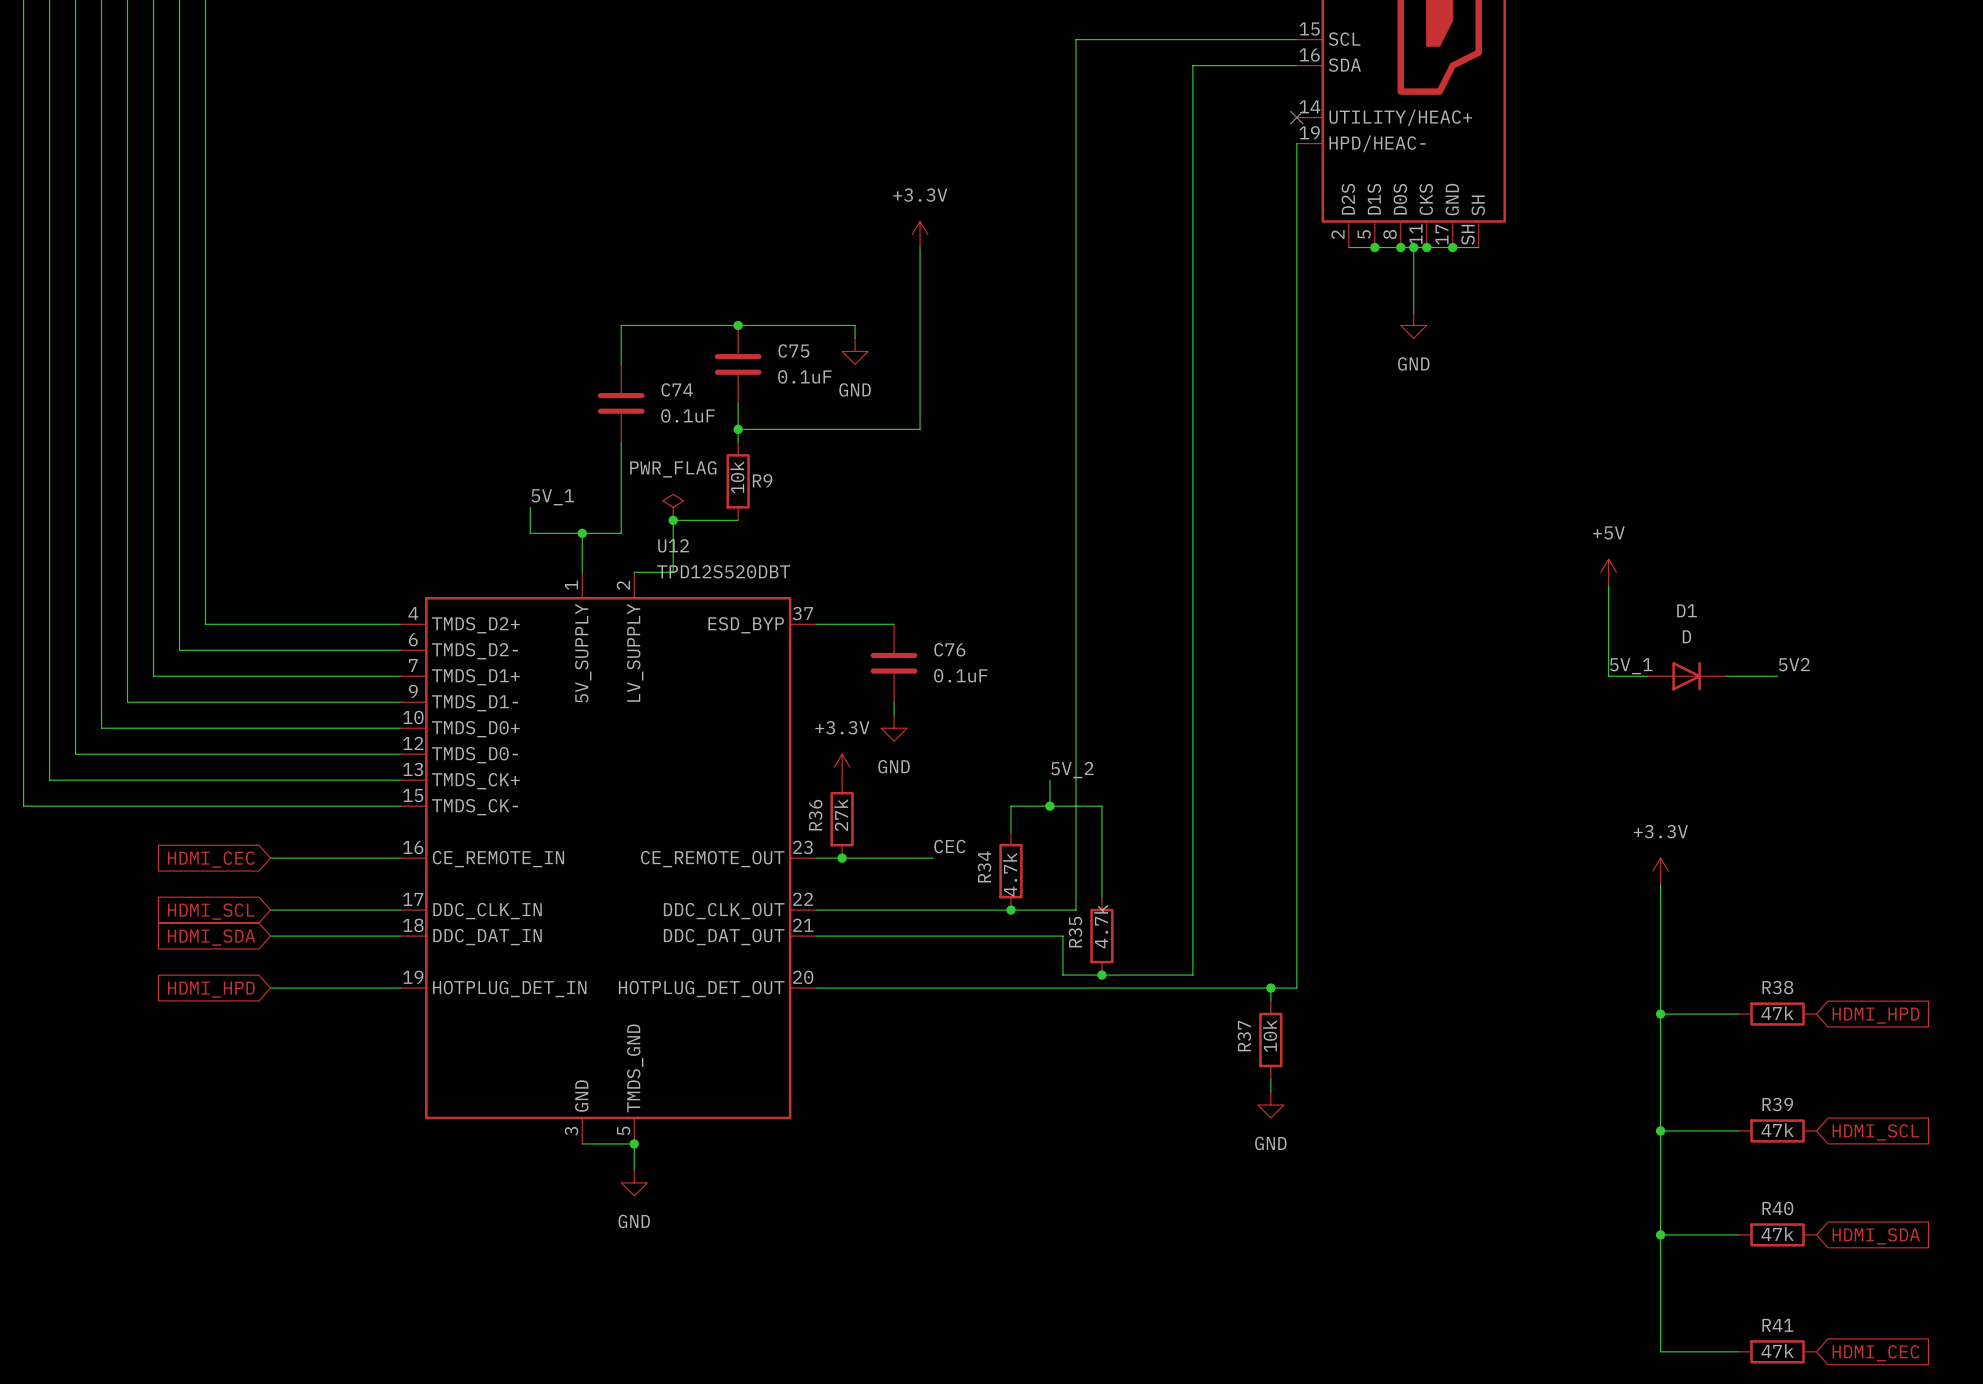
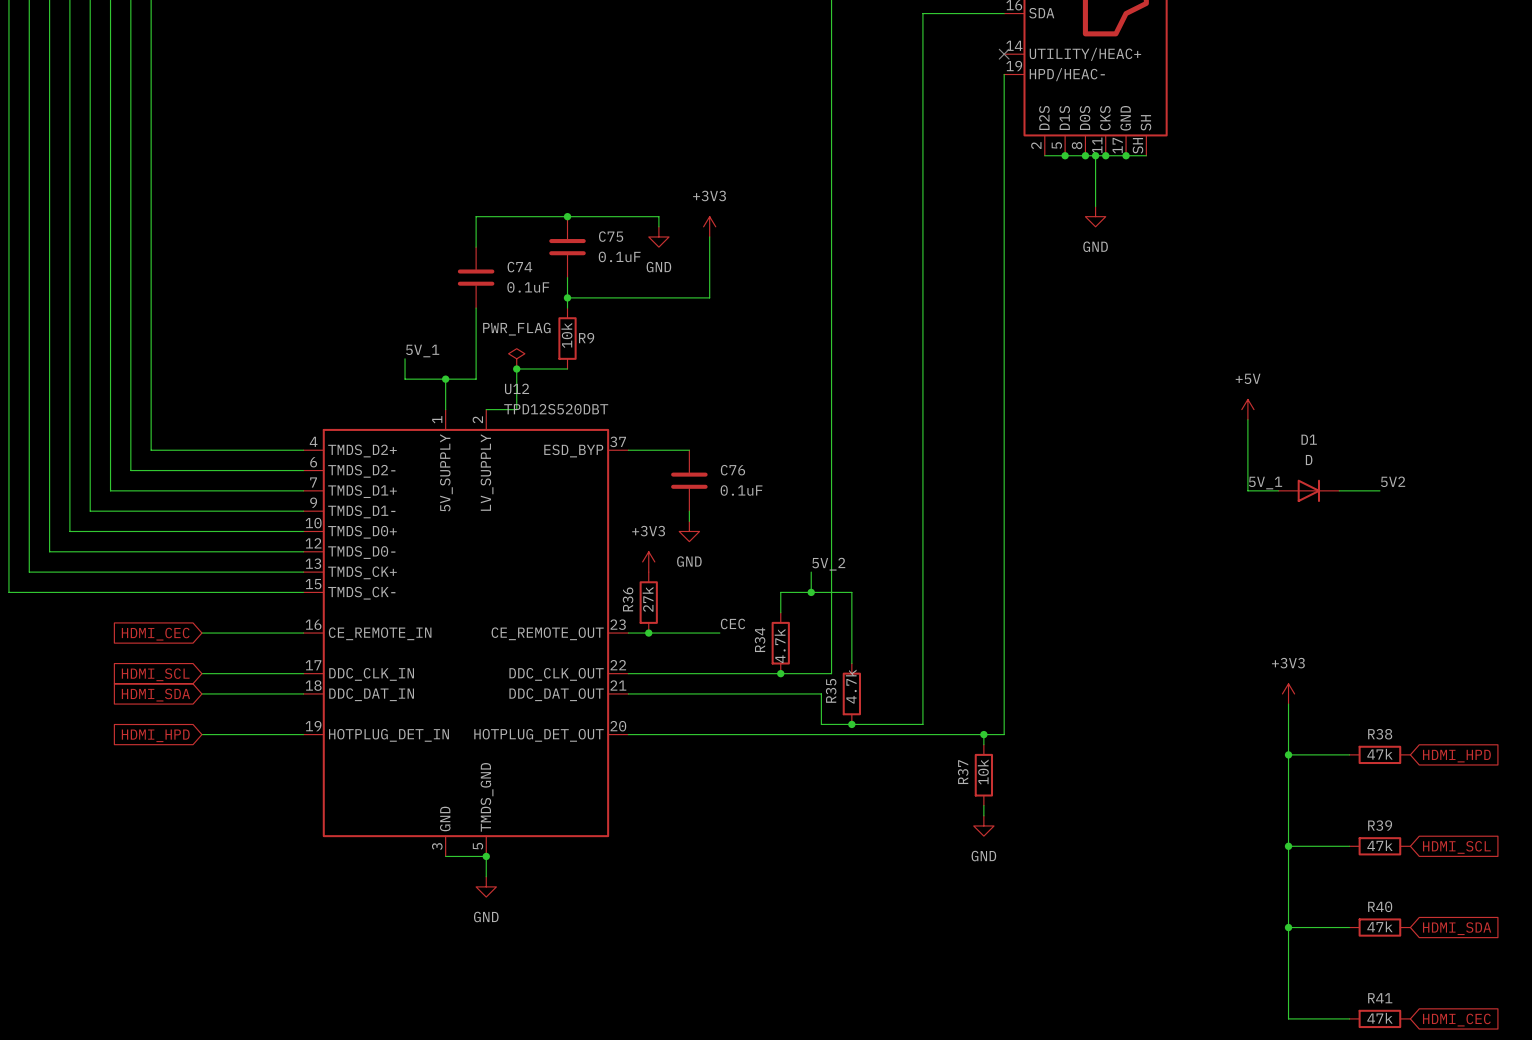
power symbol: +3.3V (920, 234) -> none
wire: (920, 247) (920, 351) -> none
power symbol: none -> +3V3 (709, 226)
power symbol: +3.3V (842, 767) -> +3V3 (648, 561)
power symbol: +3.3V (1660, 871) -> none
wire: (1660, 884) (1660, 949) -> none
power symbol: none -> +3V3 (1288, 693)

